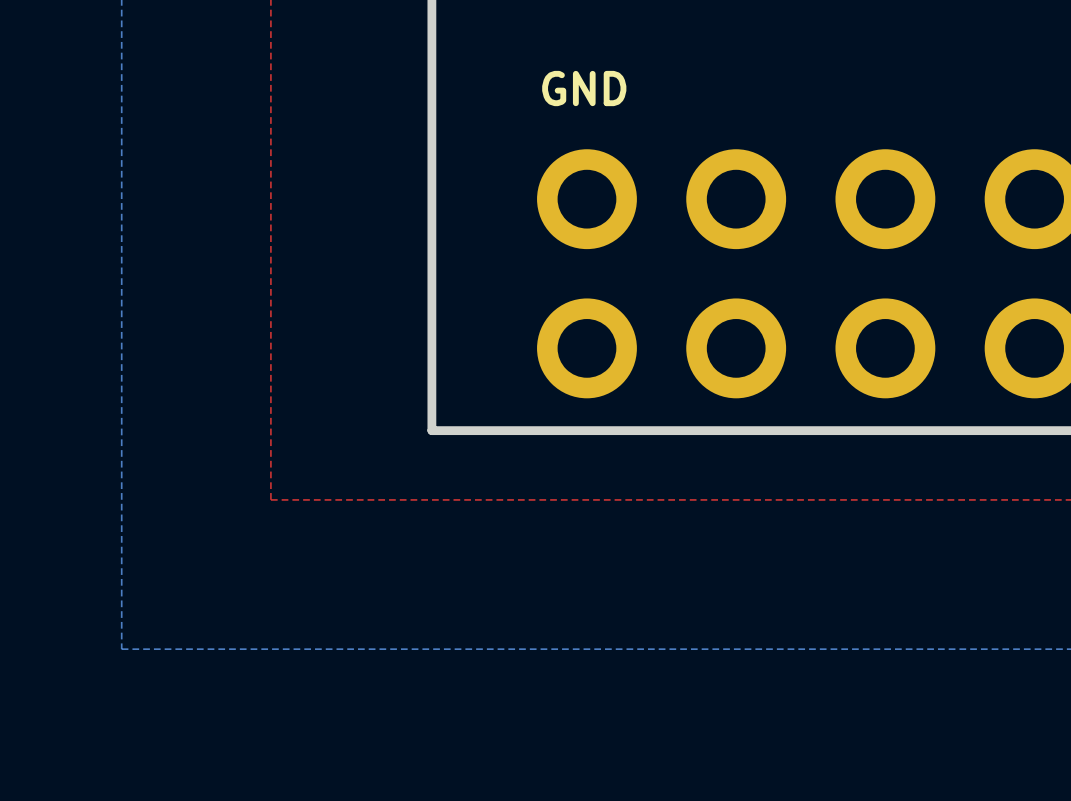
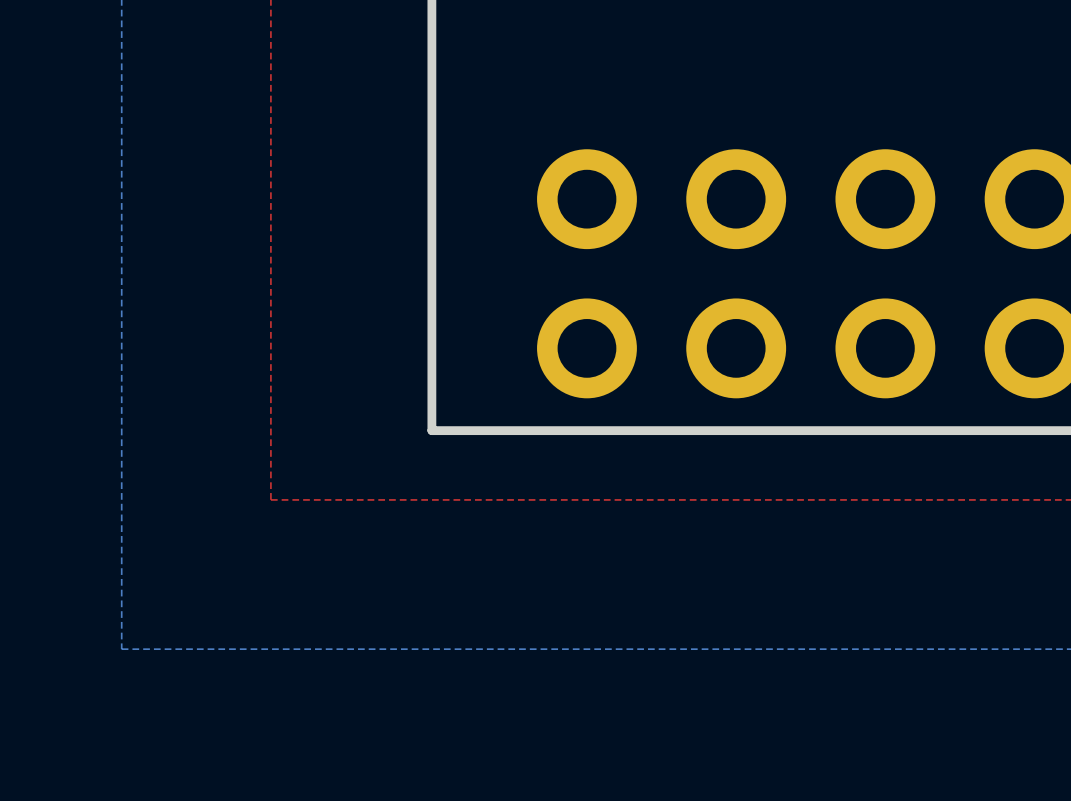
text: GND (584, 88) -> none

